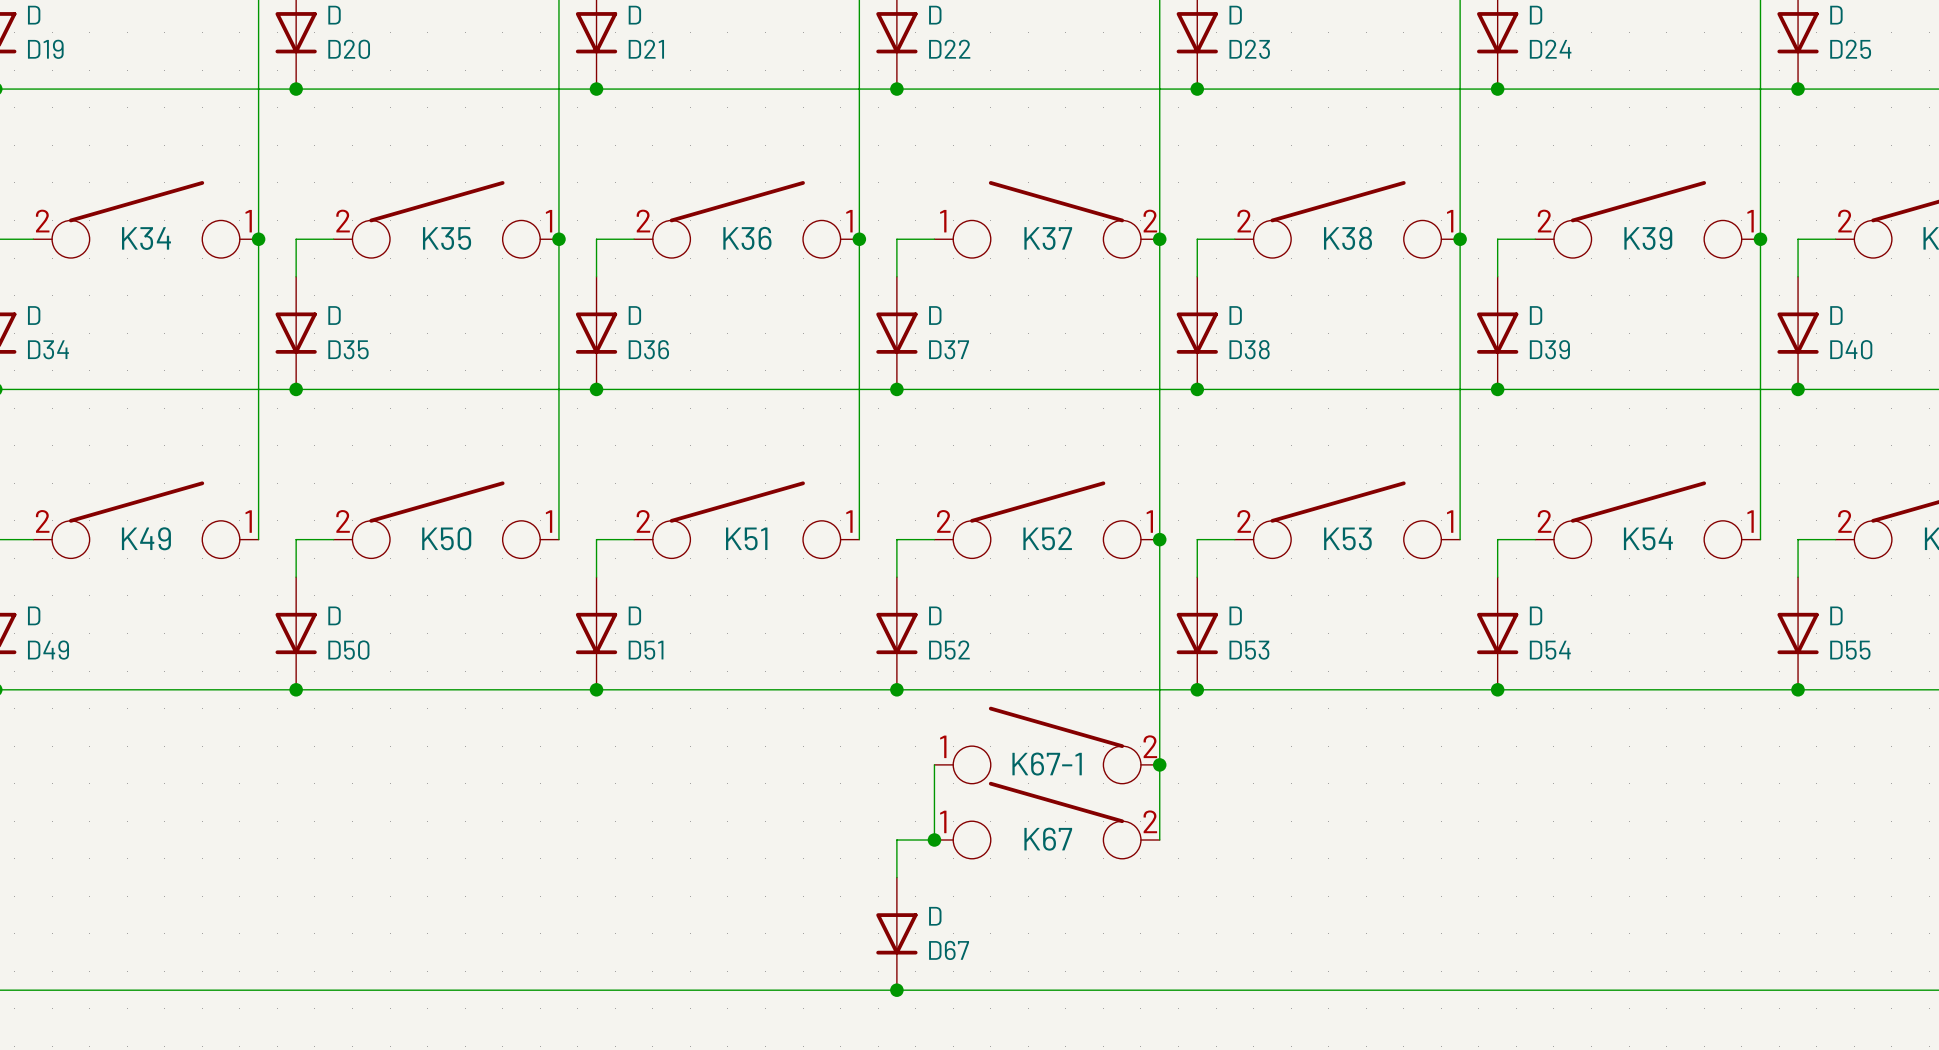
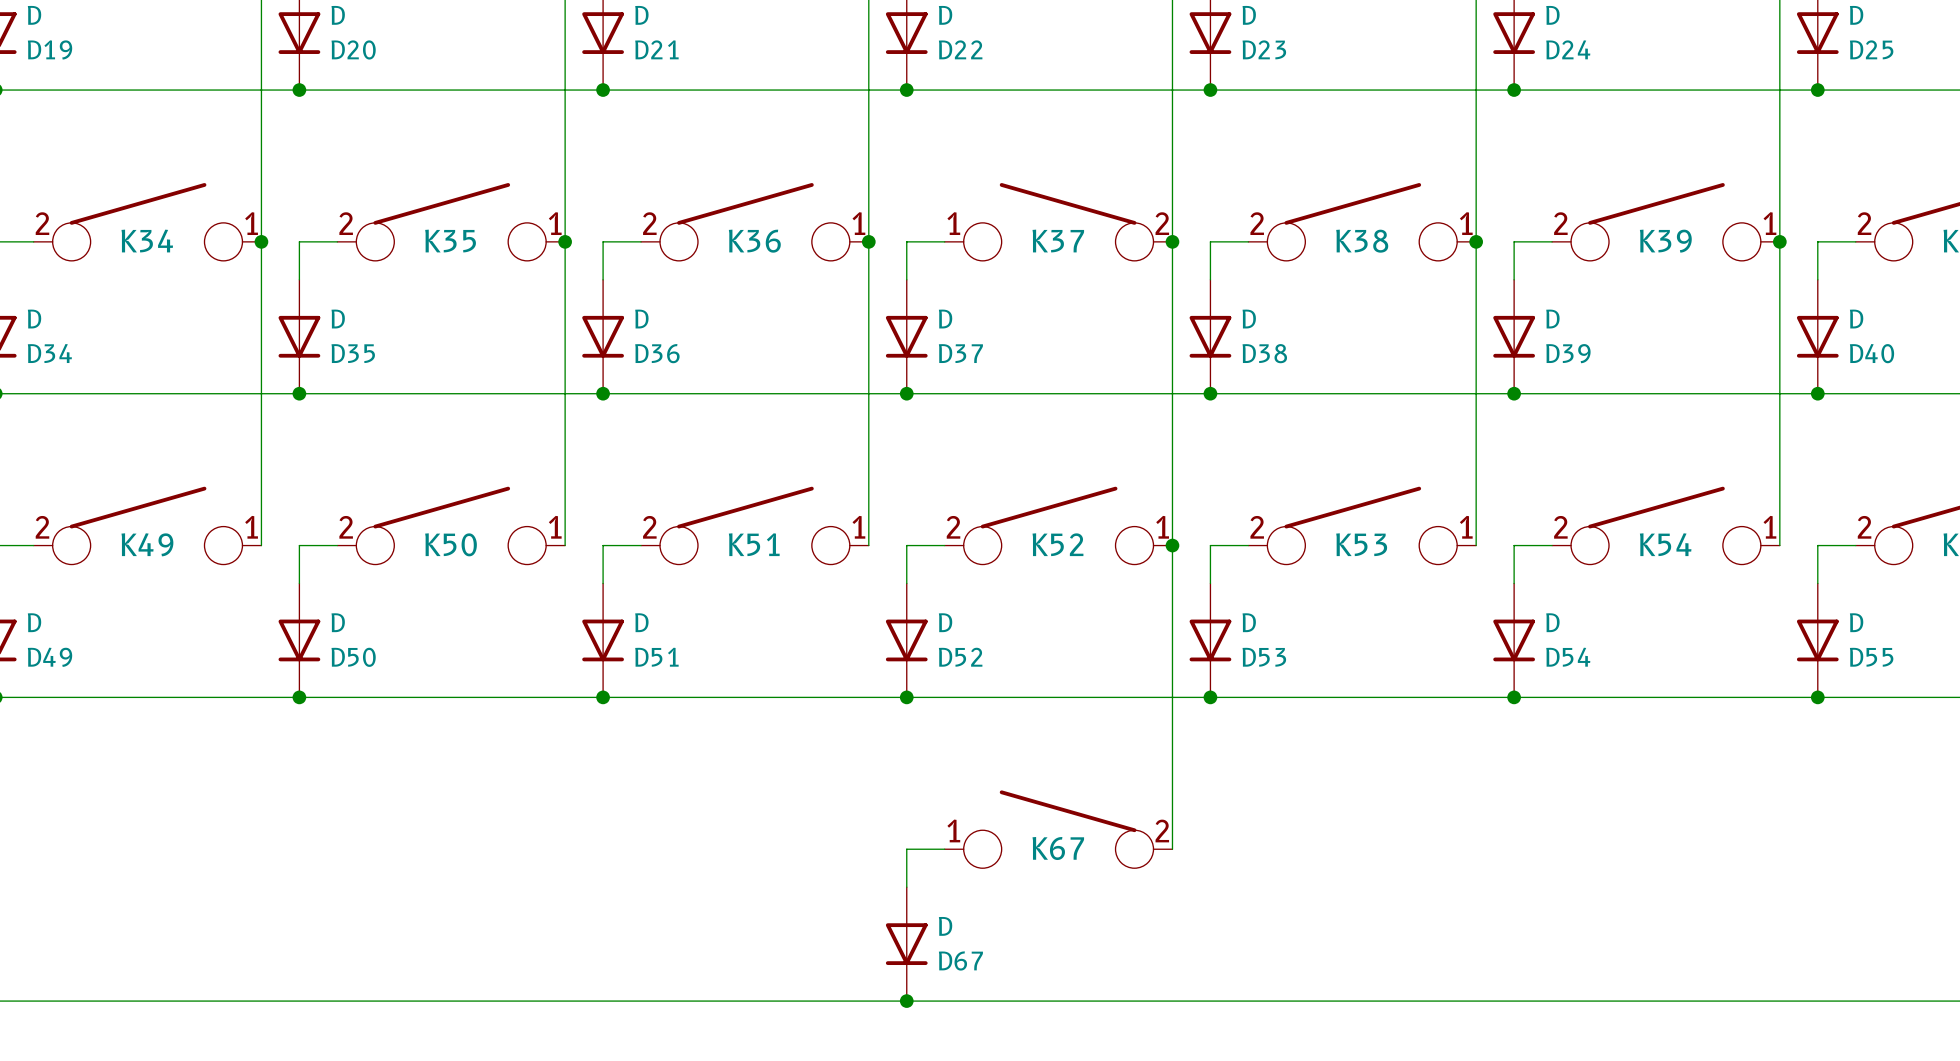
K67-1: (1047, 745) -> none
wire: (934, 764) (934, 840) -> none
junction: (1159, 764) -> none
junction: (934, 840) -> none

